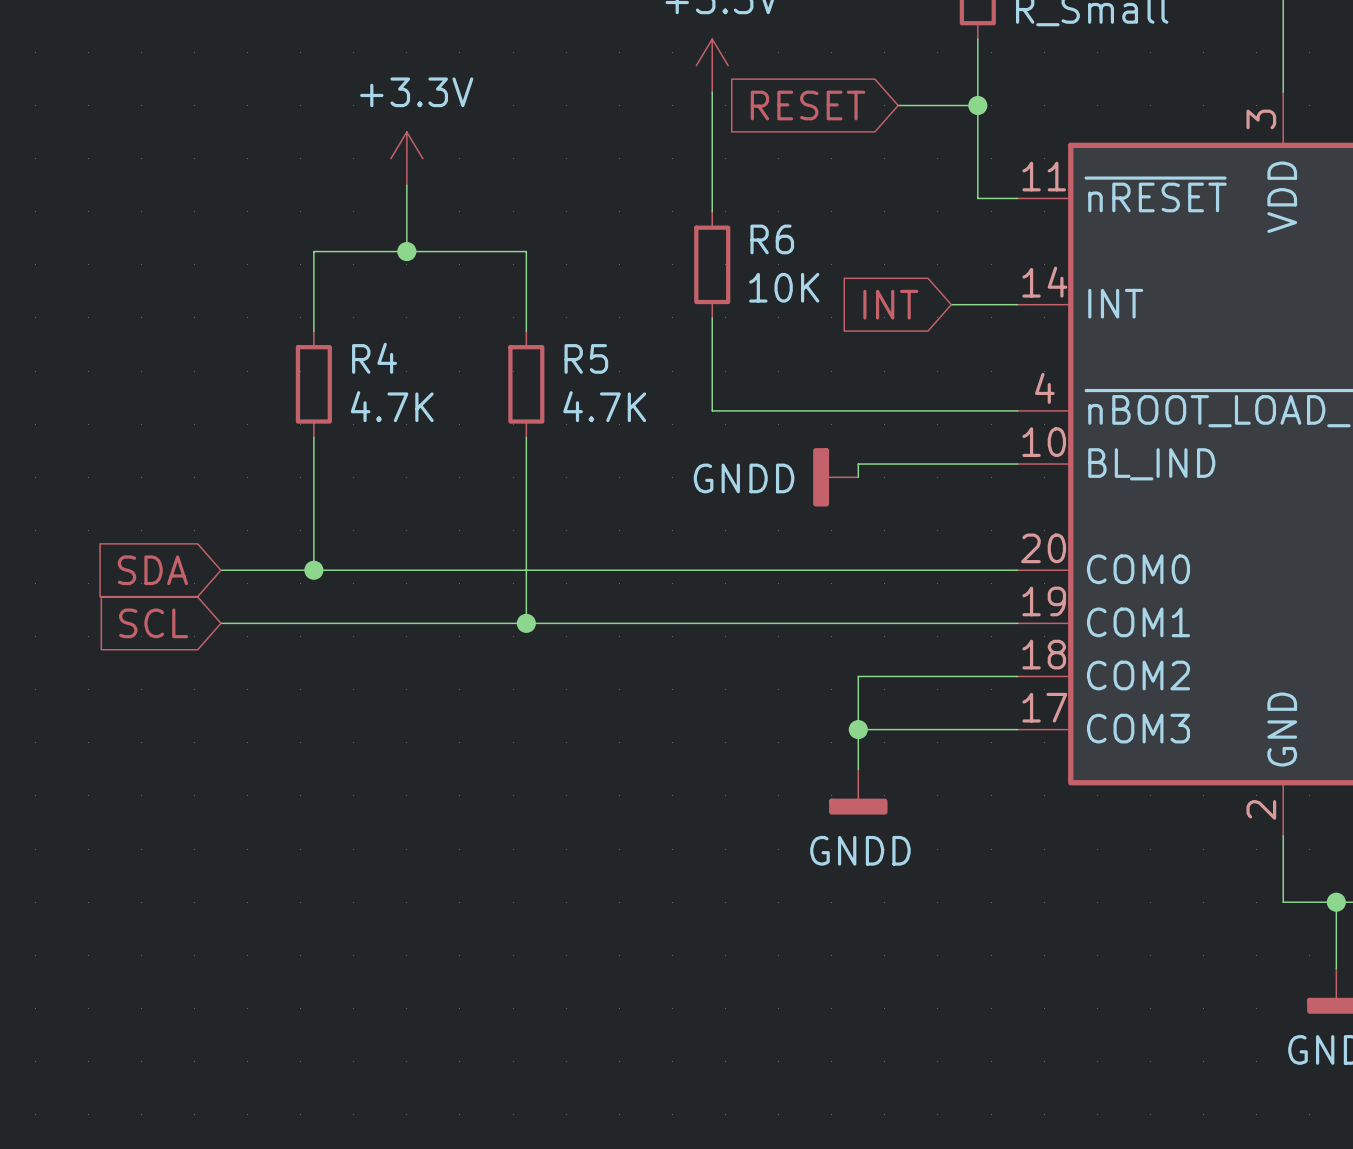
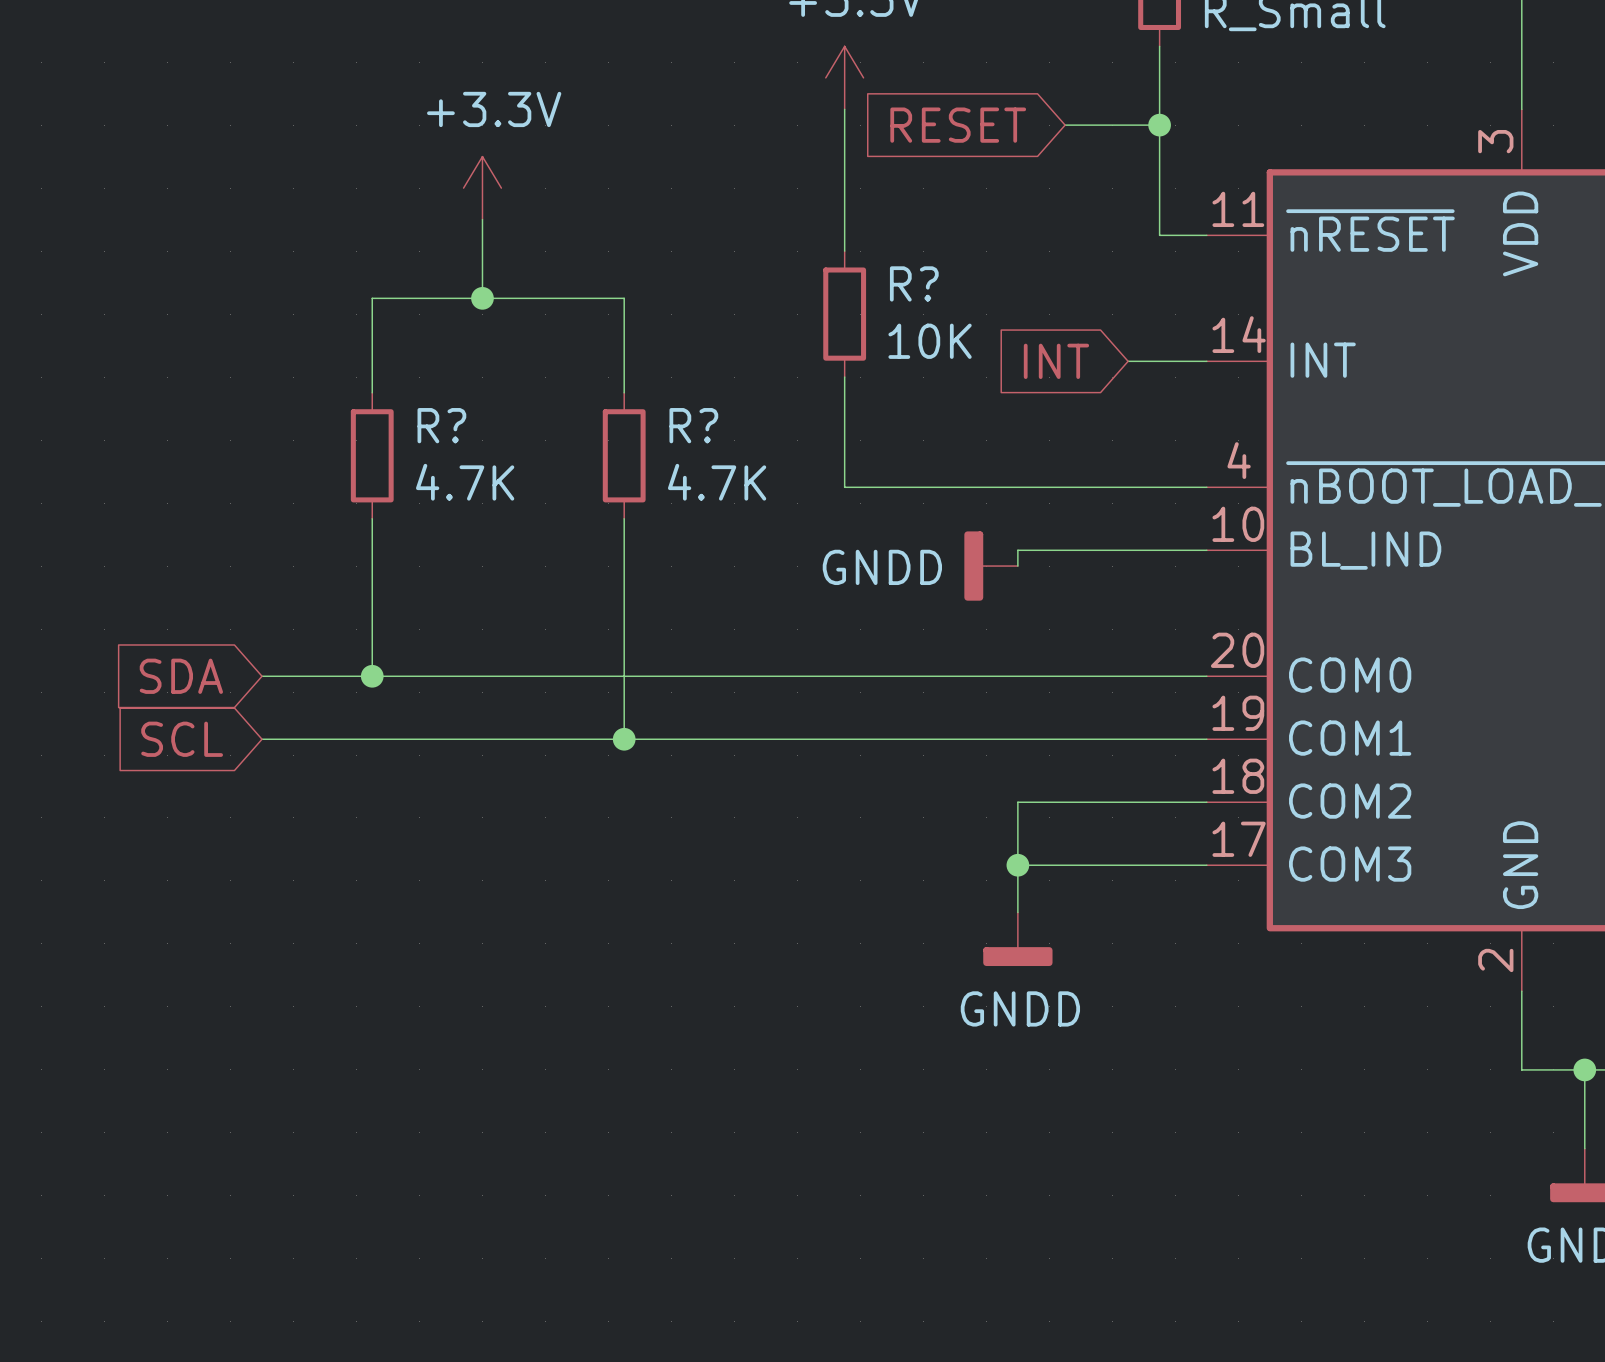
R6 name: R6 (772, 239) -> R? (914, 283)
R4 name: R4 (374, 358) -> R? (441, 425)
R5 name: R5 (586, 358) -> R? (693, 425)

